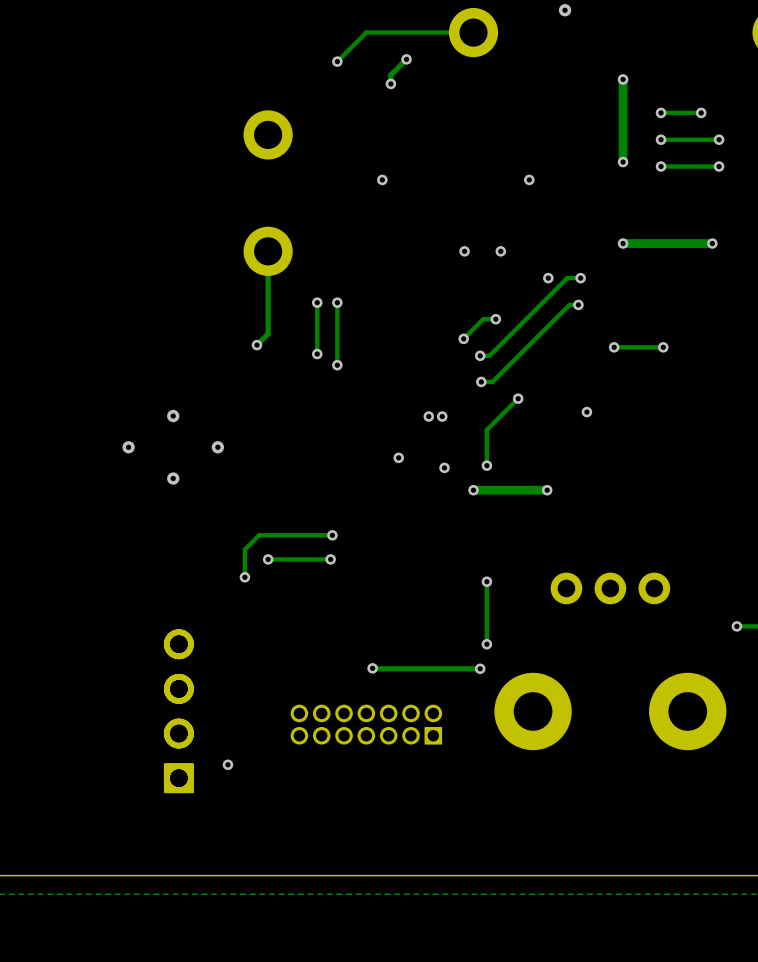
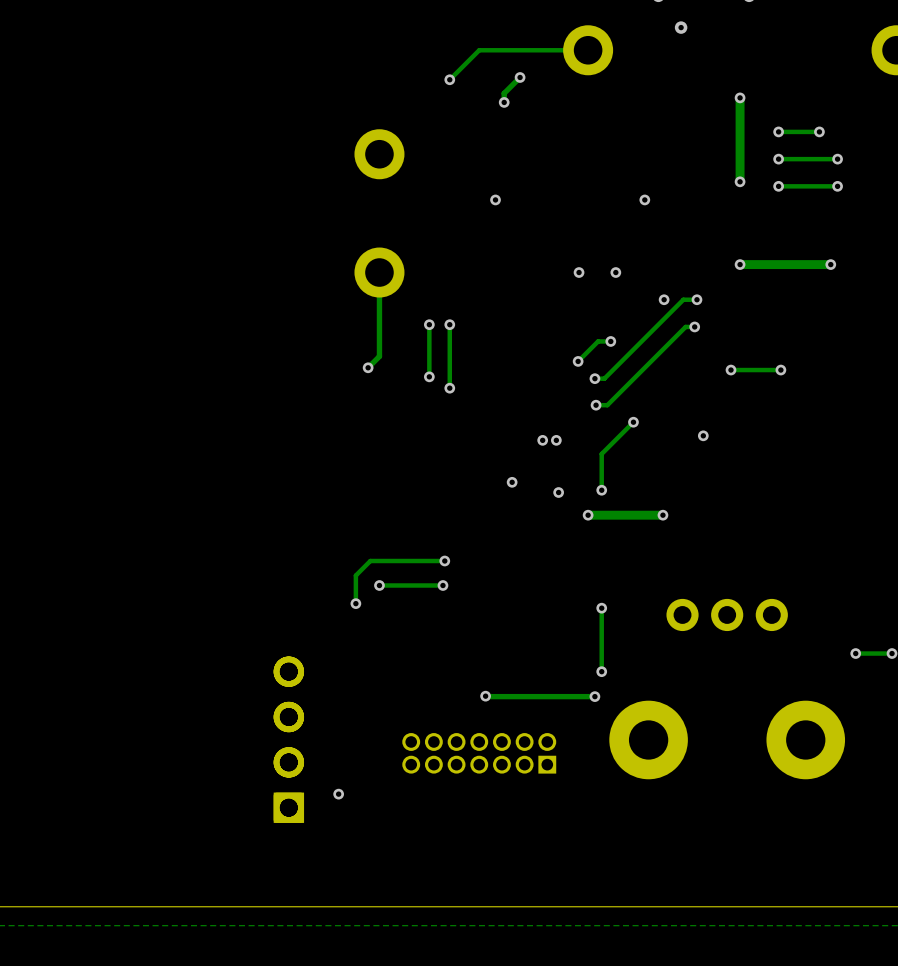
via: (173, 416) -> none
via: (128, 447) -> none
via: (217, 447) -> none
via: (173, 478) -> none

